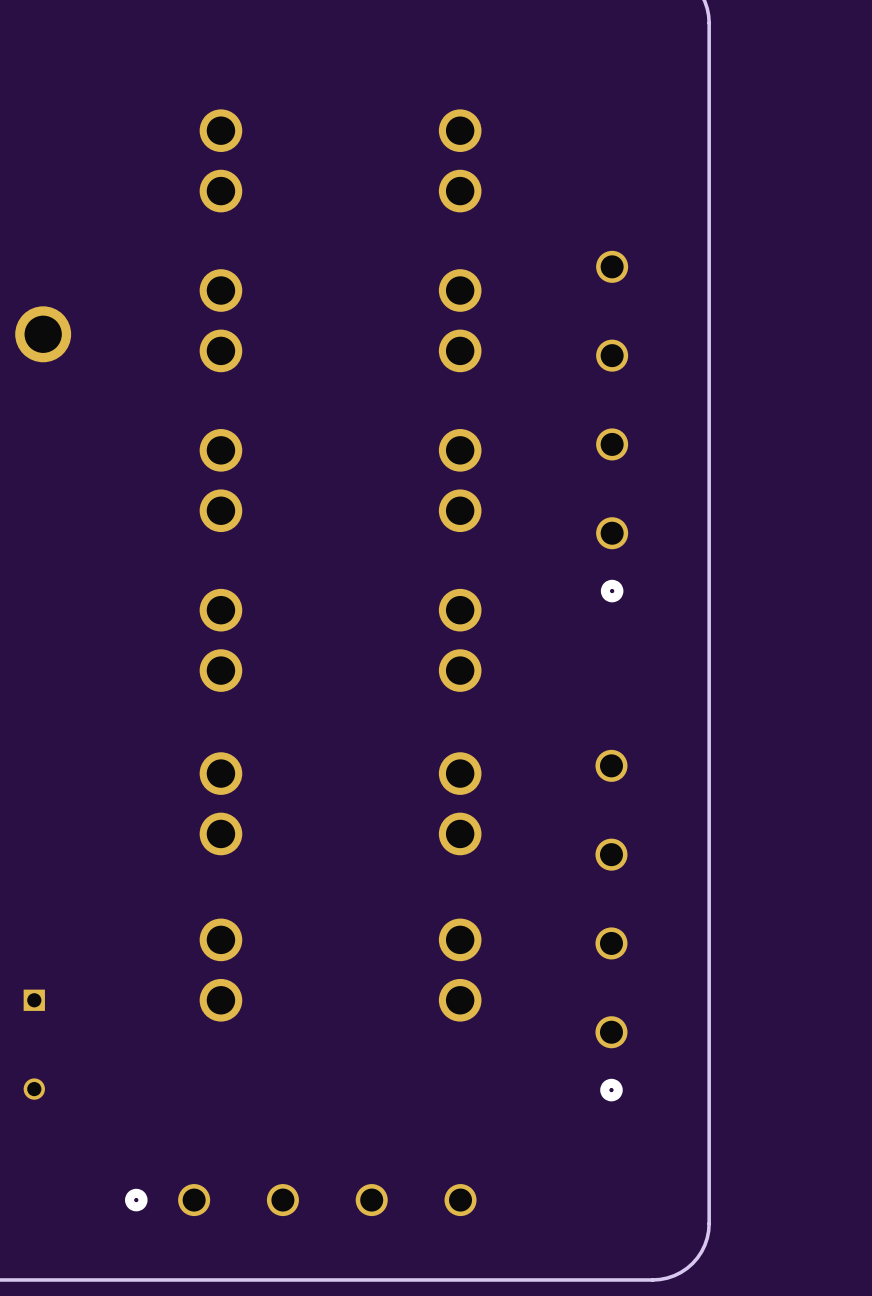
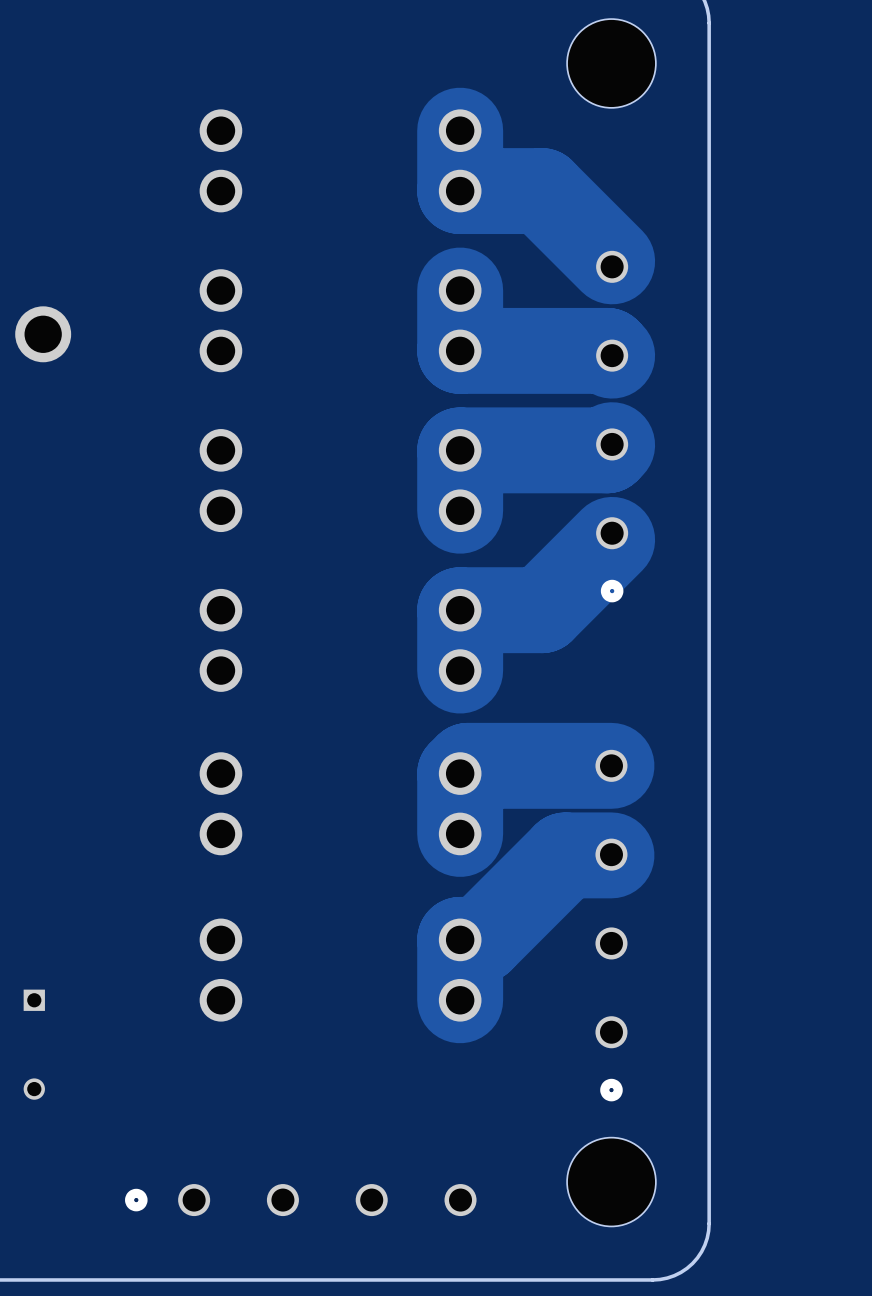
part: none -> (611, 63)
track: none -> (460, 130) (460, 191) (541, 191) (612, 261)
track: none -> (460, 290) (460, 350) (607, 350) (612, 355)
track: none -> (612, 445) (606, 450) (460, 450) (460, 510)
track: none -> (612, 539) (541, 610) (460, 610) (460, 670)
track: none -> (611, 765) (467, 765) (460, 773) (460, 833)
track: none -> (611, 855) (565, 855) (480, 939) (460, 939) (460, 1000)
part: none -> (611, 1182)

